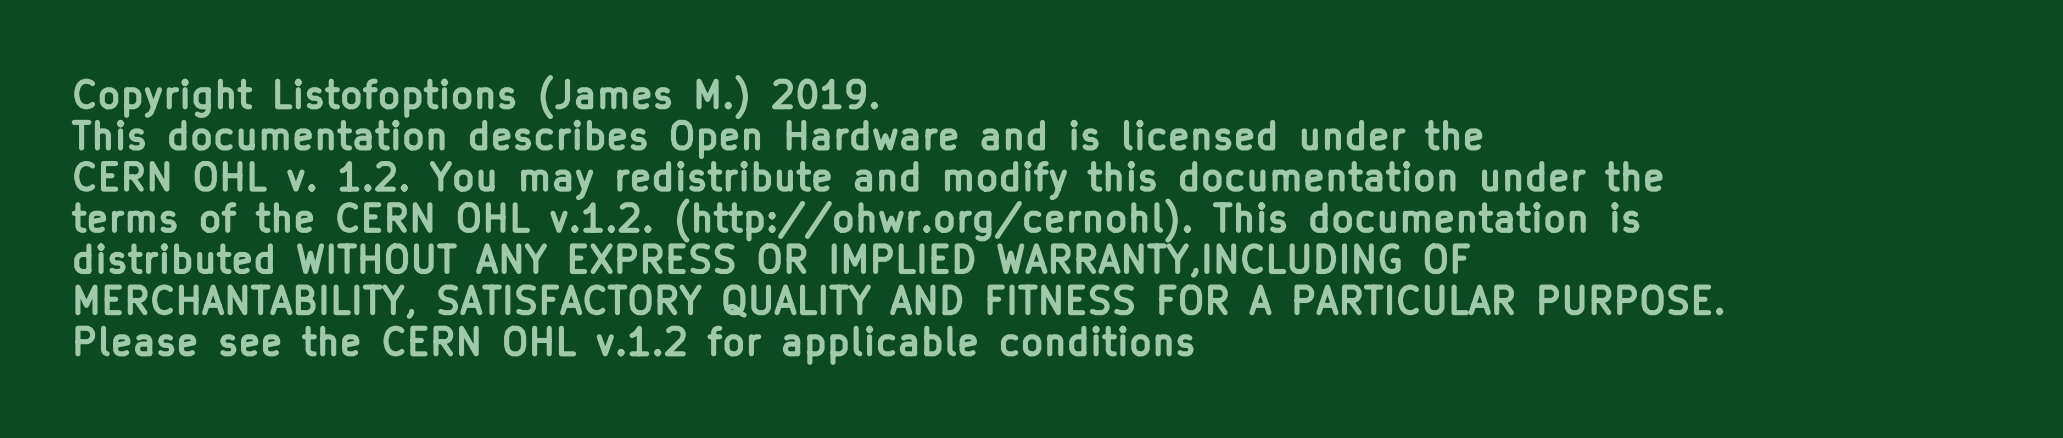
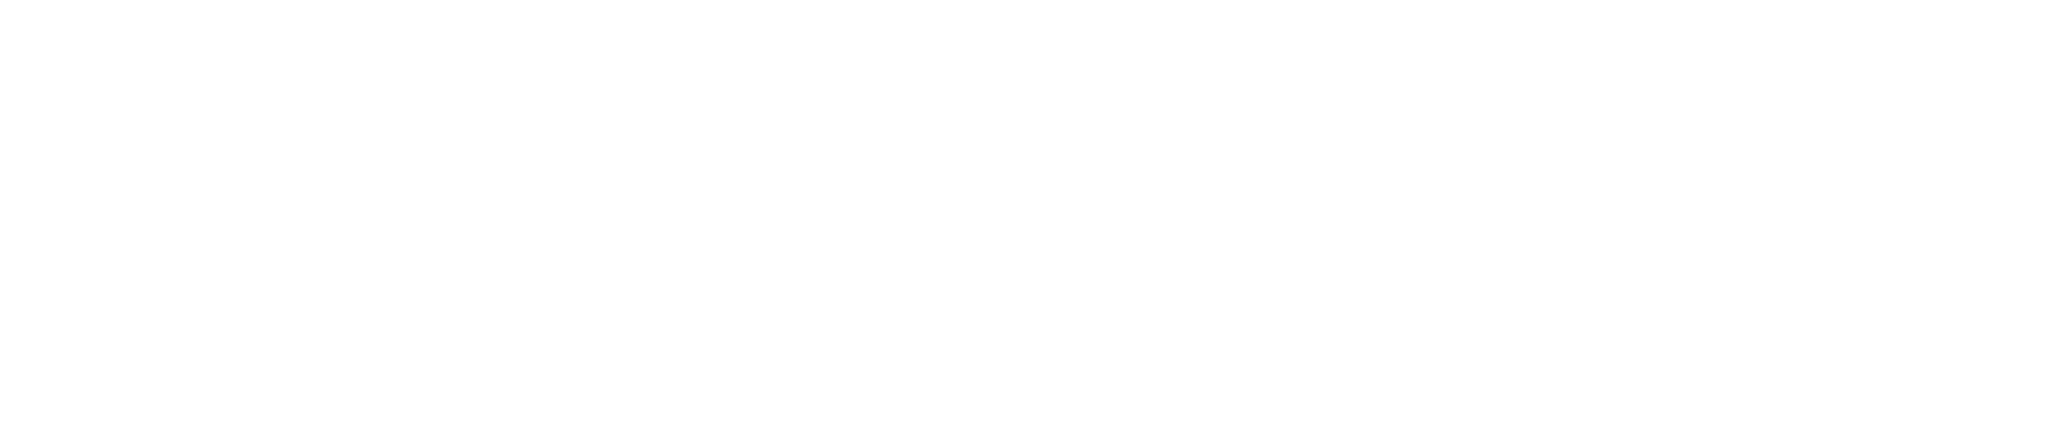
text: Copyright Listofoptions (James M.) 2019. (476, 97) -> none
text: This documentation describes Open Hardware and is licensed under the (776, 139) -> none
text: CERN OHL v. 1.2. You may redistribute and modify this documentation under the (868, 180) -> none
text: terms of the CERN OHL v.1.2. (http://ohwr.org/cernohl). This documentation is (855, 220) -> none
text: distributed WITHOUT ANY EXPRESS OR IMPLIED WARRANTY,INCLUDING OF (772, 260) -> none
text: MERCHANTABILITY, SATISFACTORY QUALITY AND FITNESS FOR A PARTICULAR PURPOSE. (899, 301) -> none
text: Please see the CERN OHL v.1.2 for applicable conditions (634, 345) -> none

